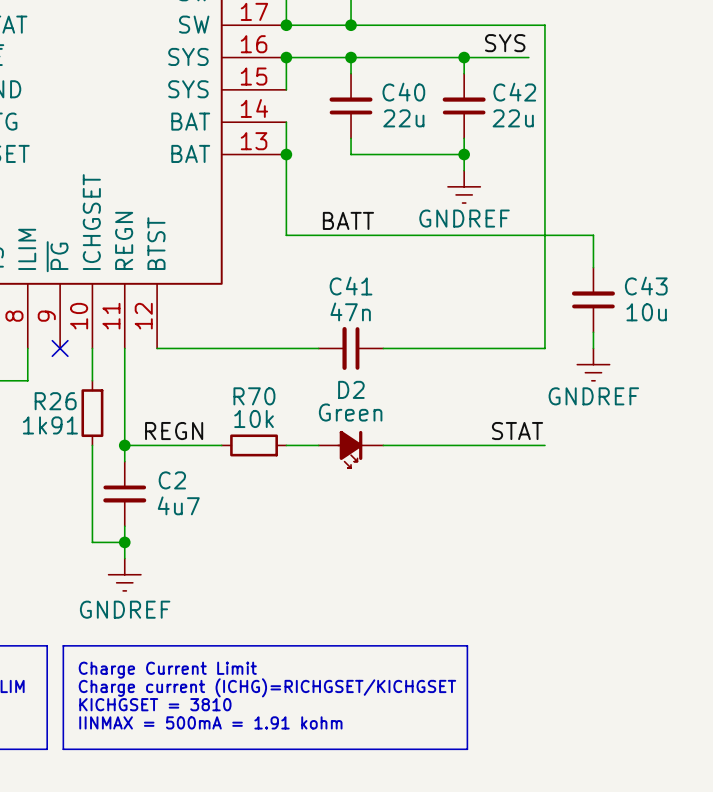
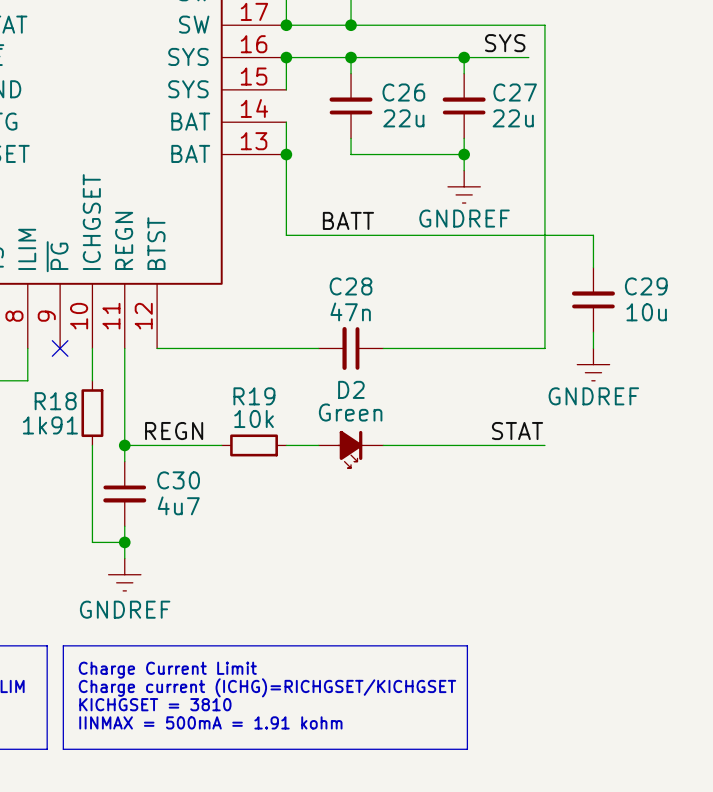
C40 name: C40 (403, 92) -> C26 (403, 92)
C42 name: C42 (514, 92) -> C27 (515, 92)
C41 name: C41 (351, 286) -> C28 (351, 286)
C43 name: C43 (646, 286) -> C29 (646, 286)
R70 name: R70 (254, 396) -> R19 (254, 396)
R26 name: R26 (55, 401) -> R18 (55, 401)
C2 name: C2 (172, 480) -> C30 (178, 480)

